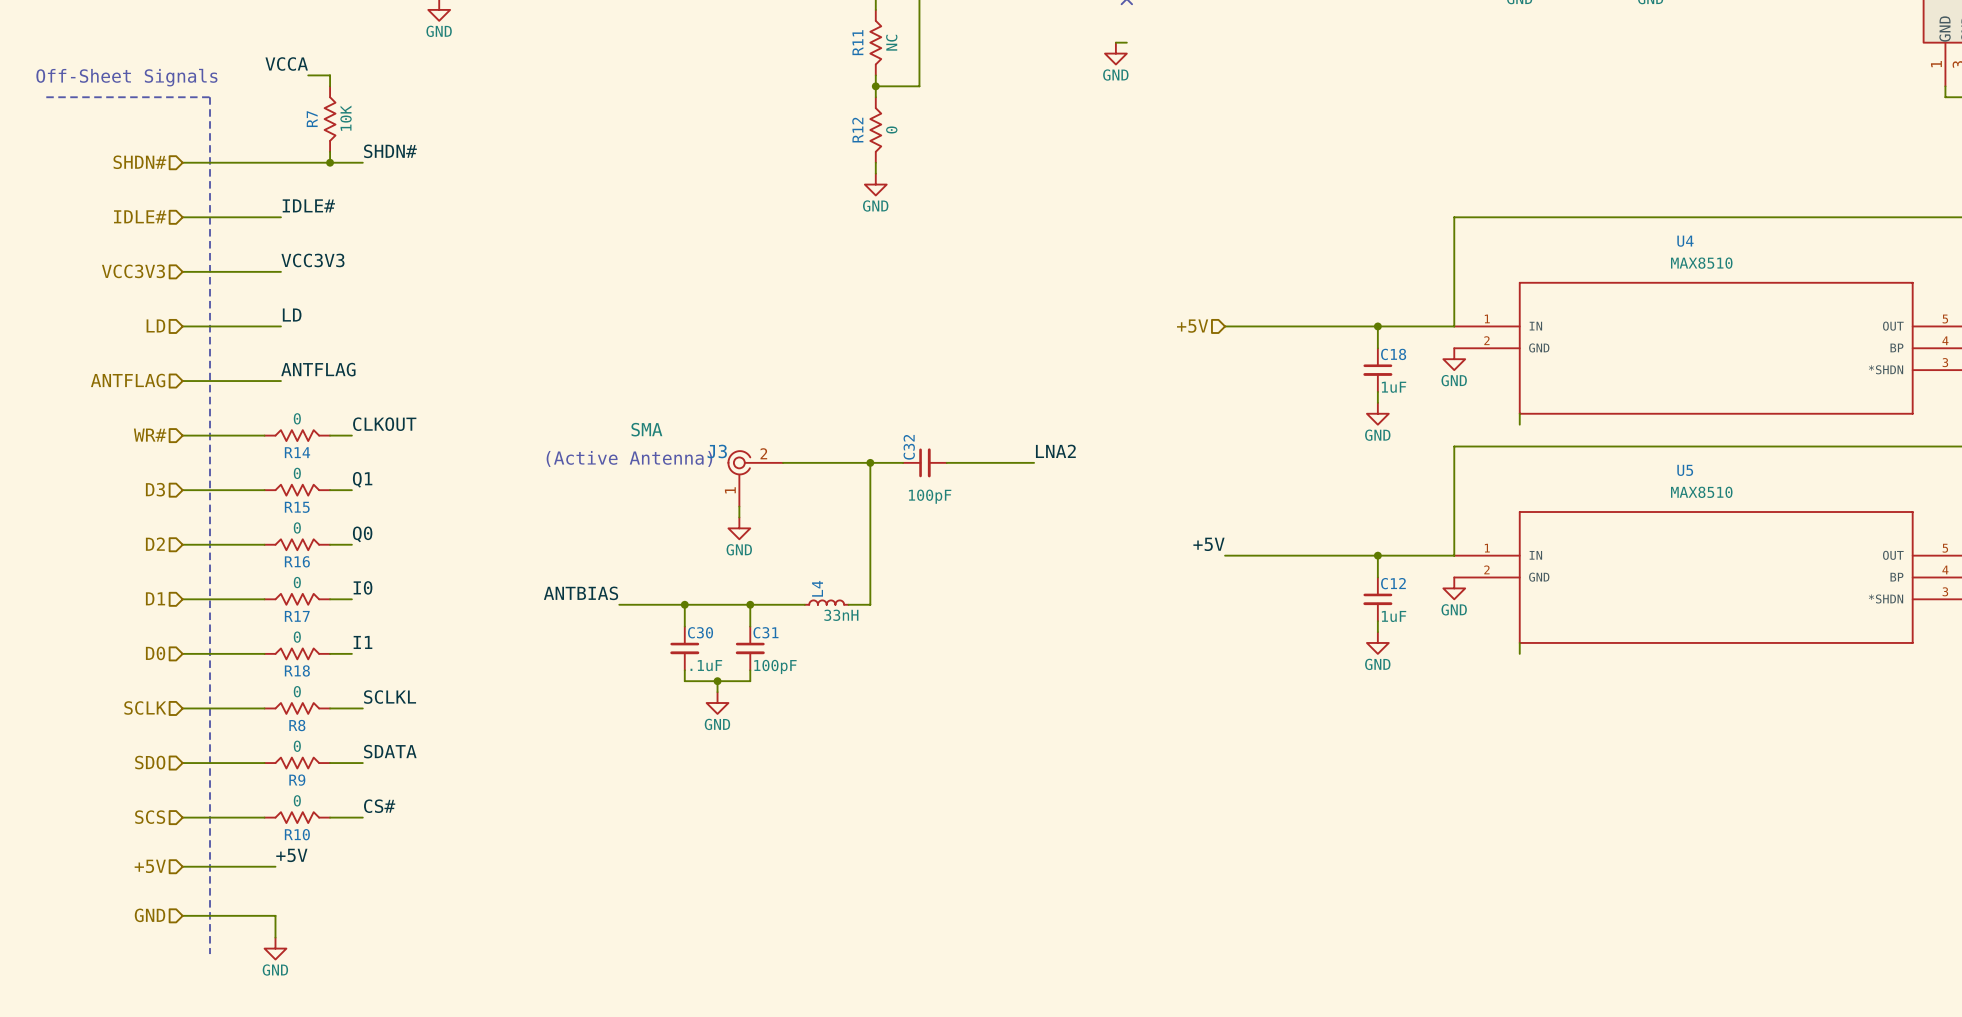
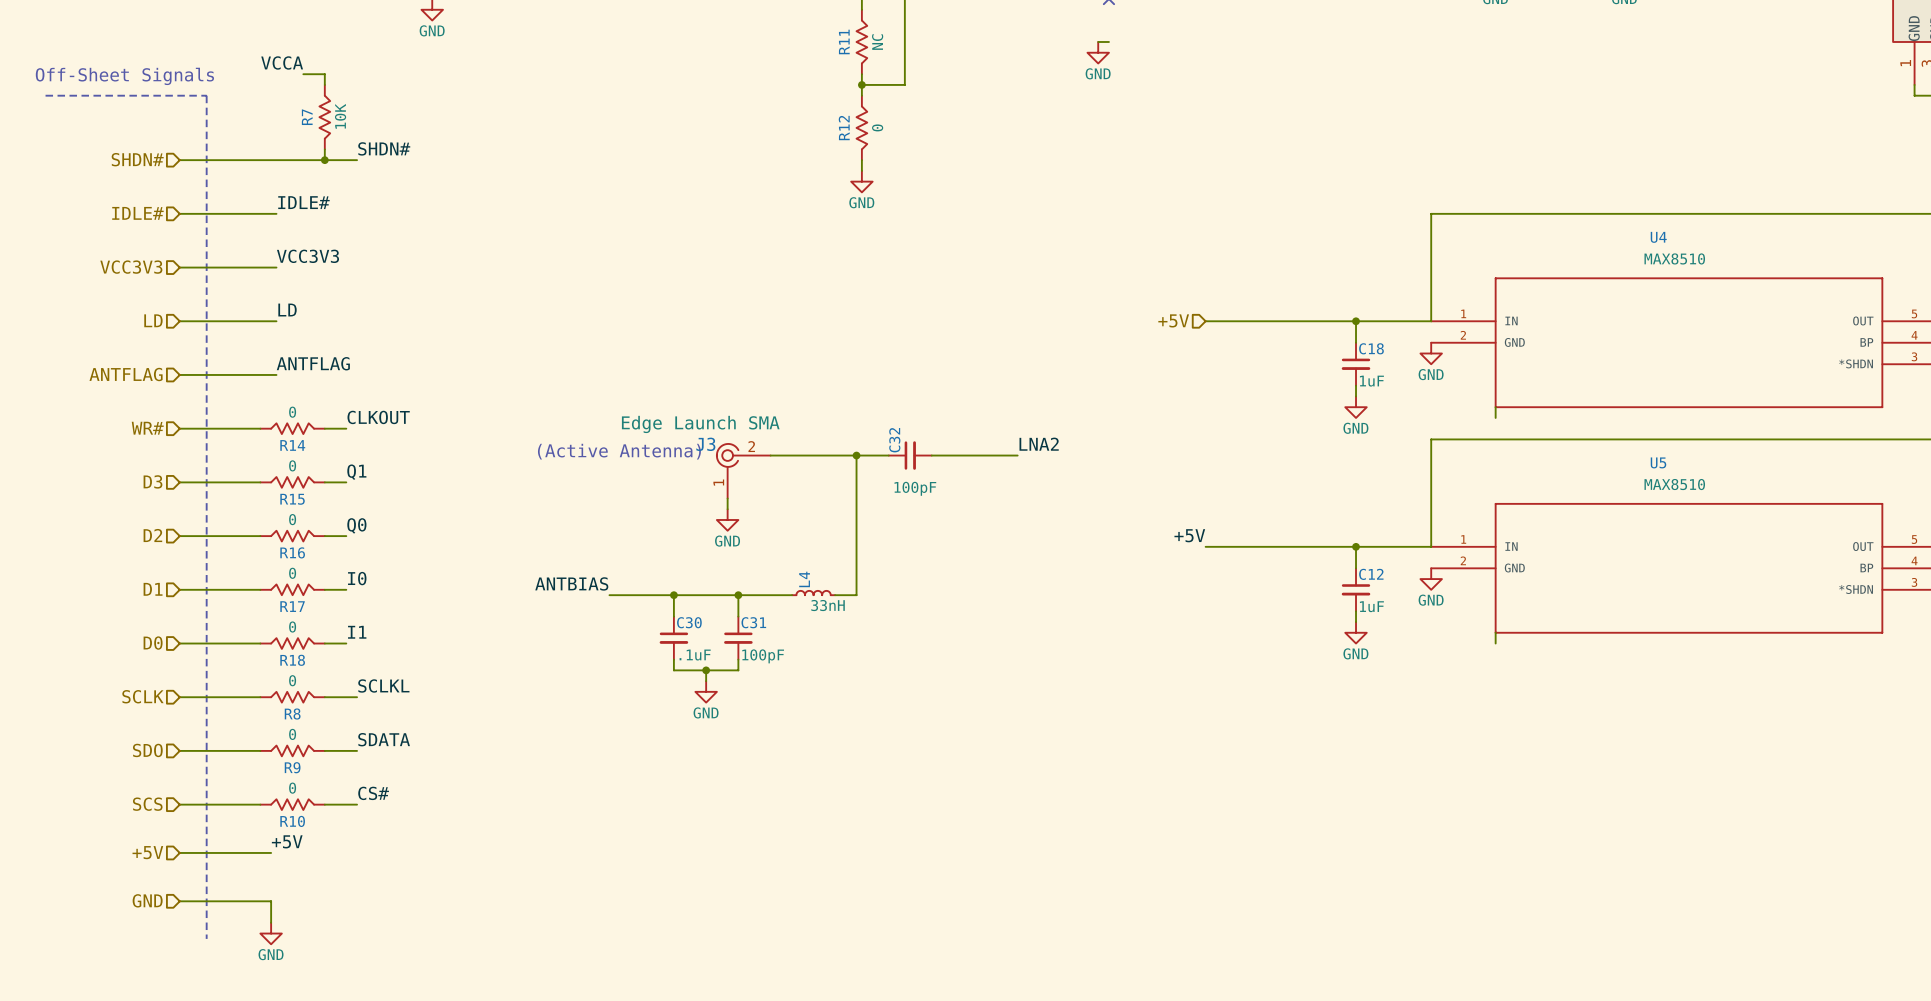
J3 value: SMA (646, 429) -> Edge Launch SMA (700, 424)

